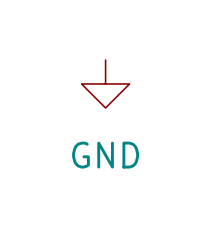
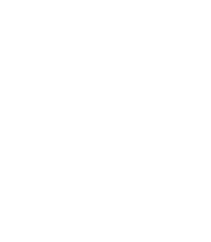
power symbol: GND (105, 83) -> none

